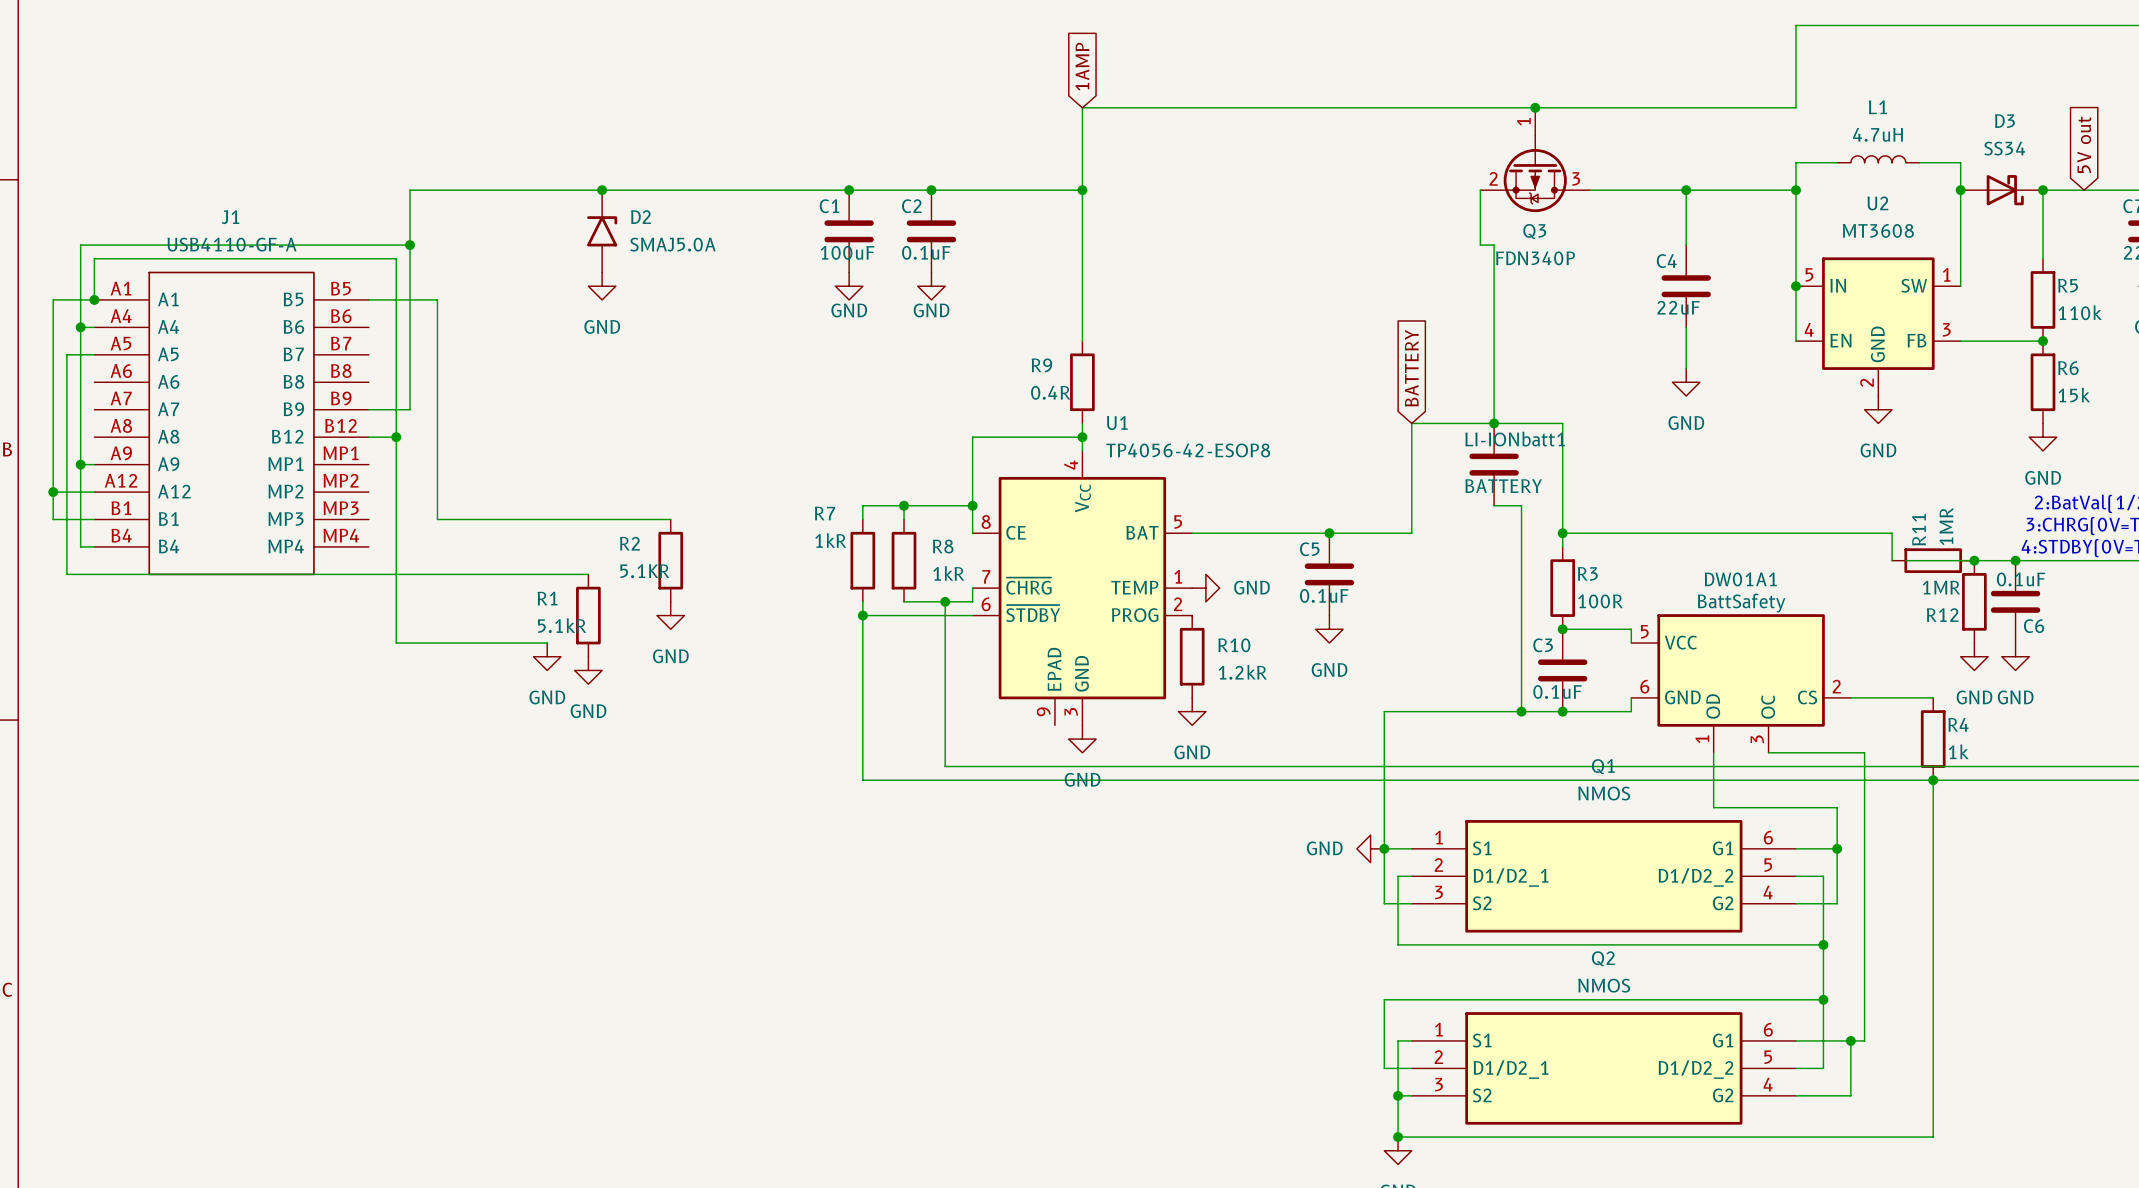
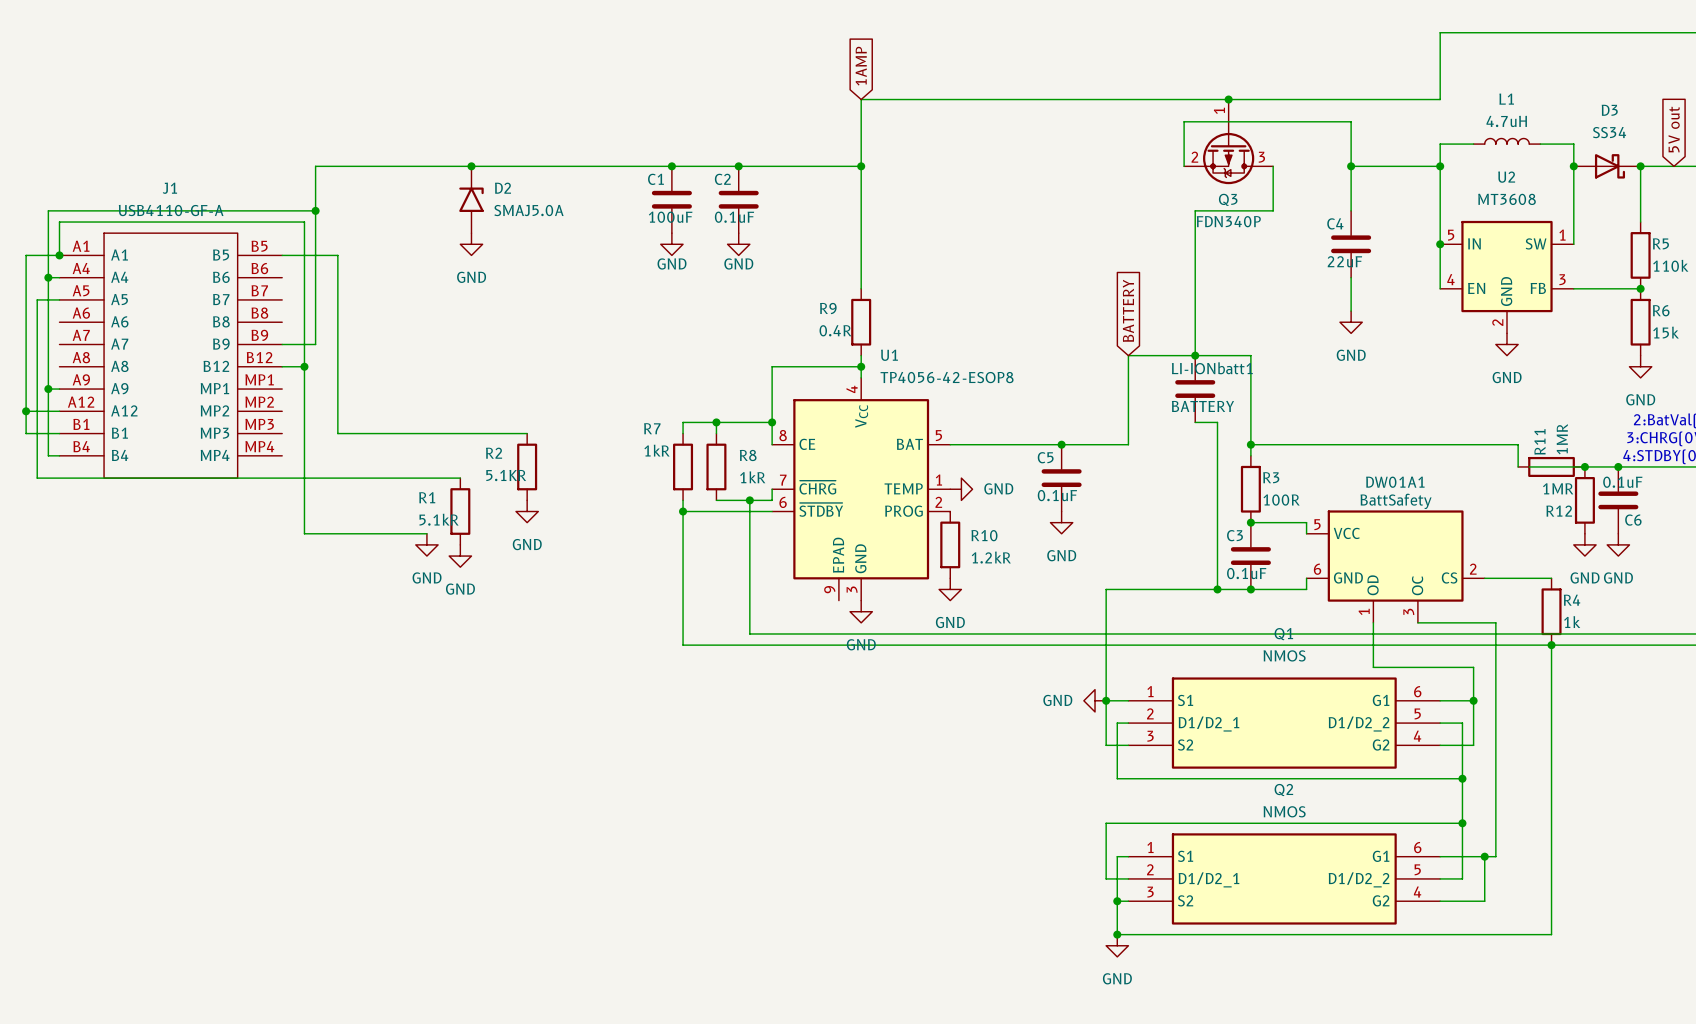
wire: (1480, 190) (1480, 245) (1494, 245) -> (1273, 166) (1273, 210) (1195, 210)
wire: (1590, 190) (1686, 190) -> (1184, 166) (1184, 121) (1351, 121) (1351, 166)

